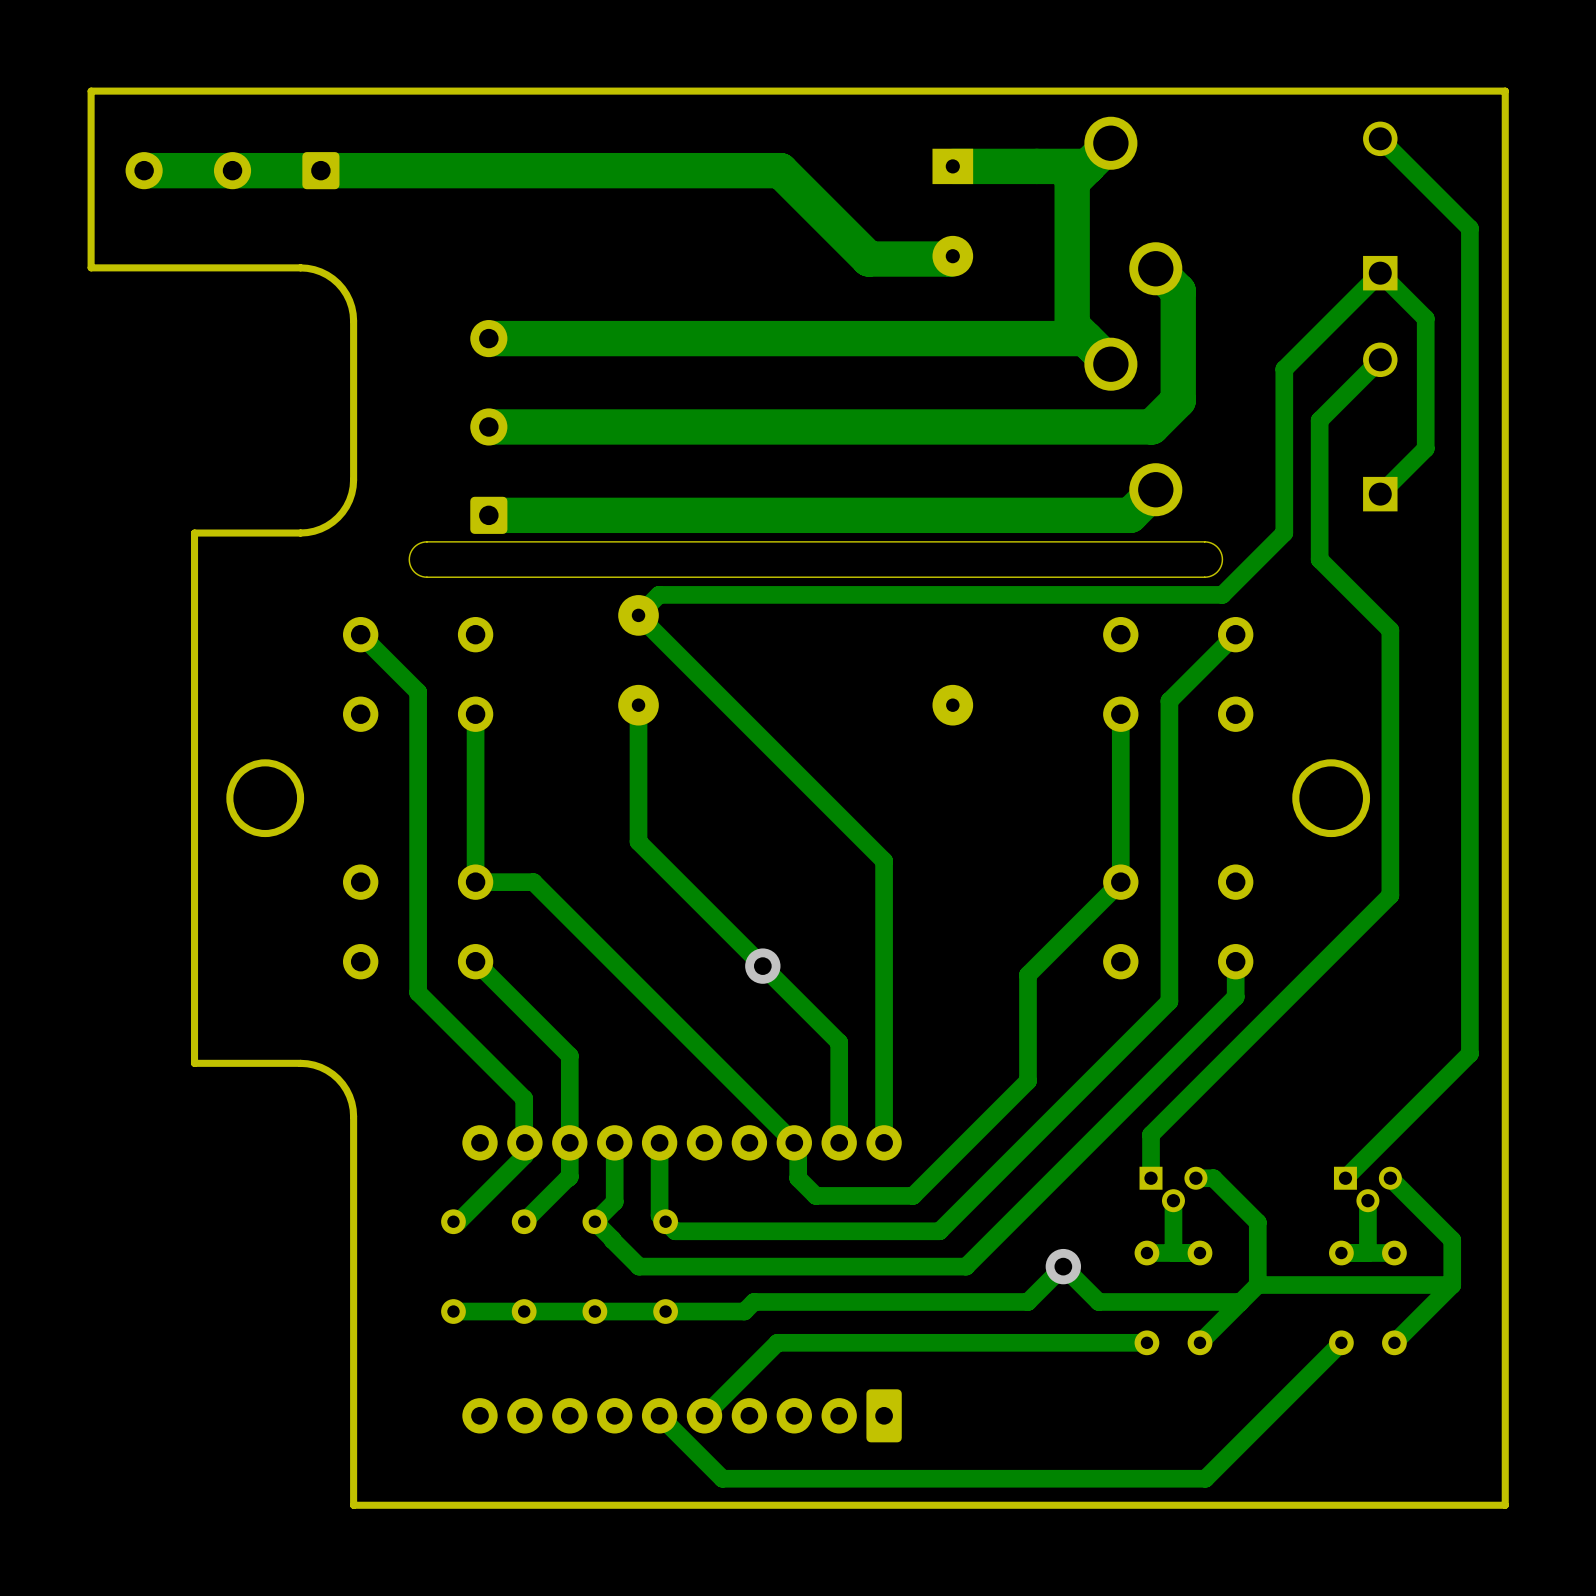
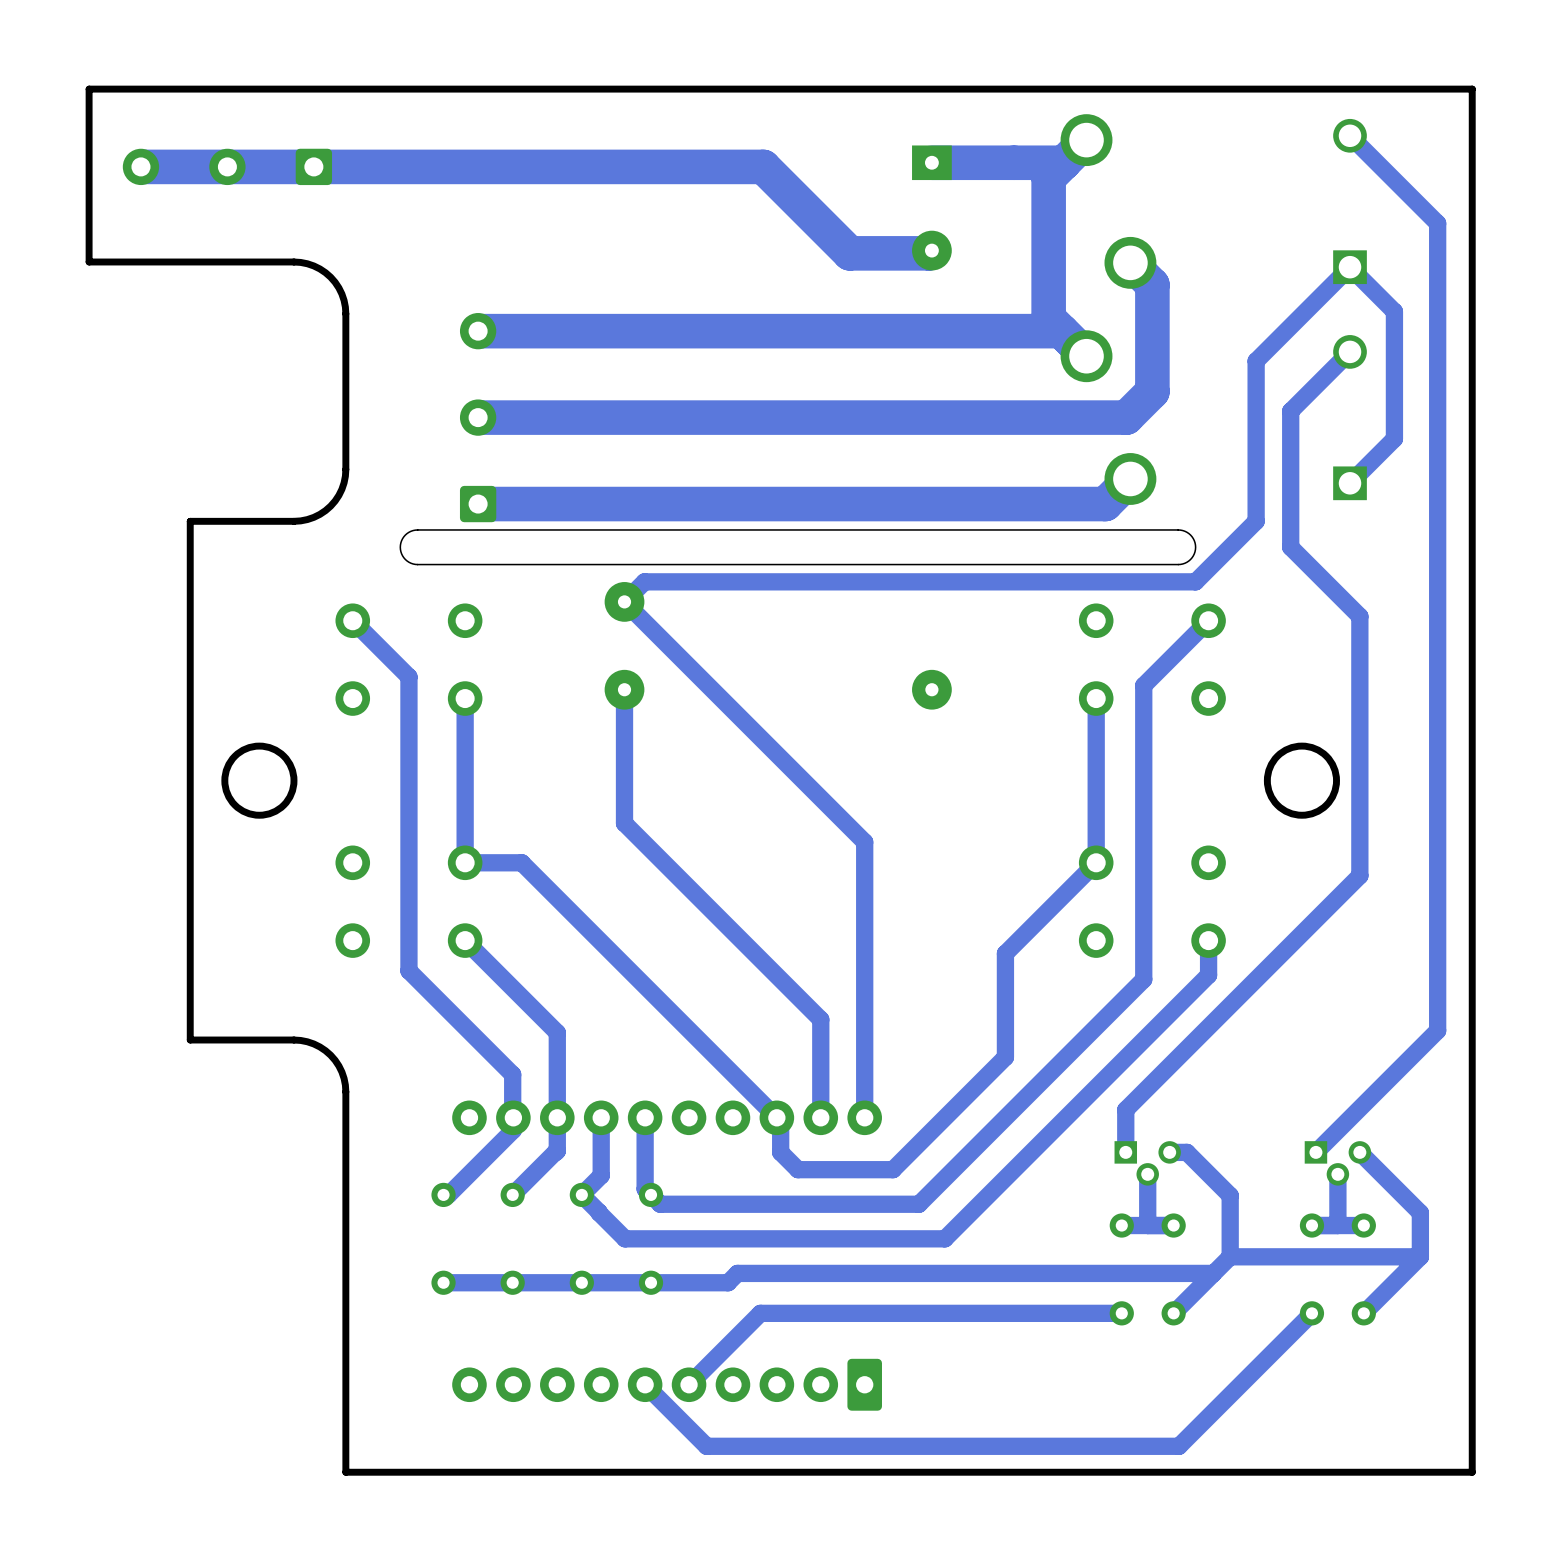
via: (762, 966) -> none
via: (1063, 1266) -> none
track: (1098, 1301) (1063, 1266) (1027, 1301) -> (1074, 1273) (1005, 1273)

